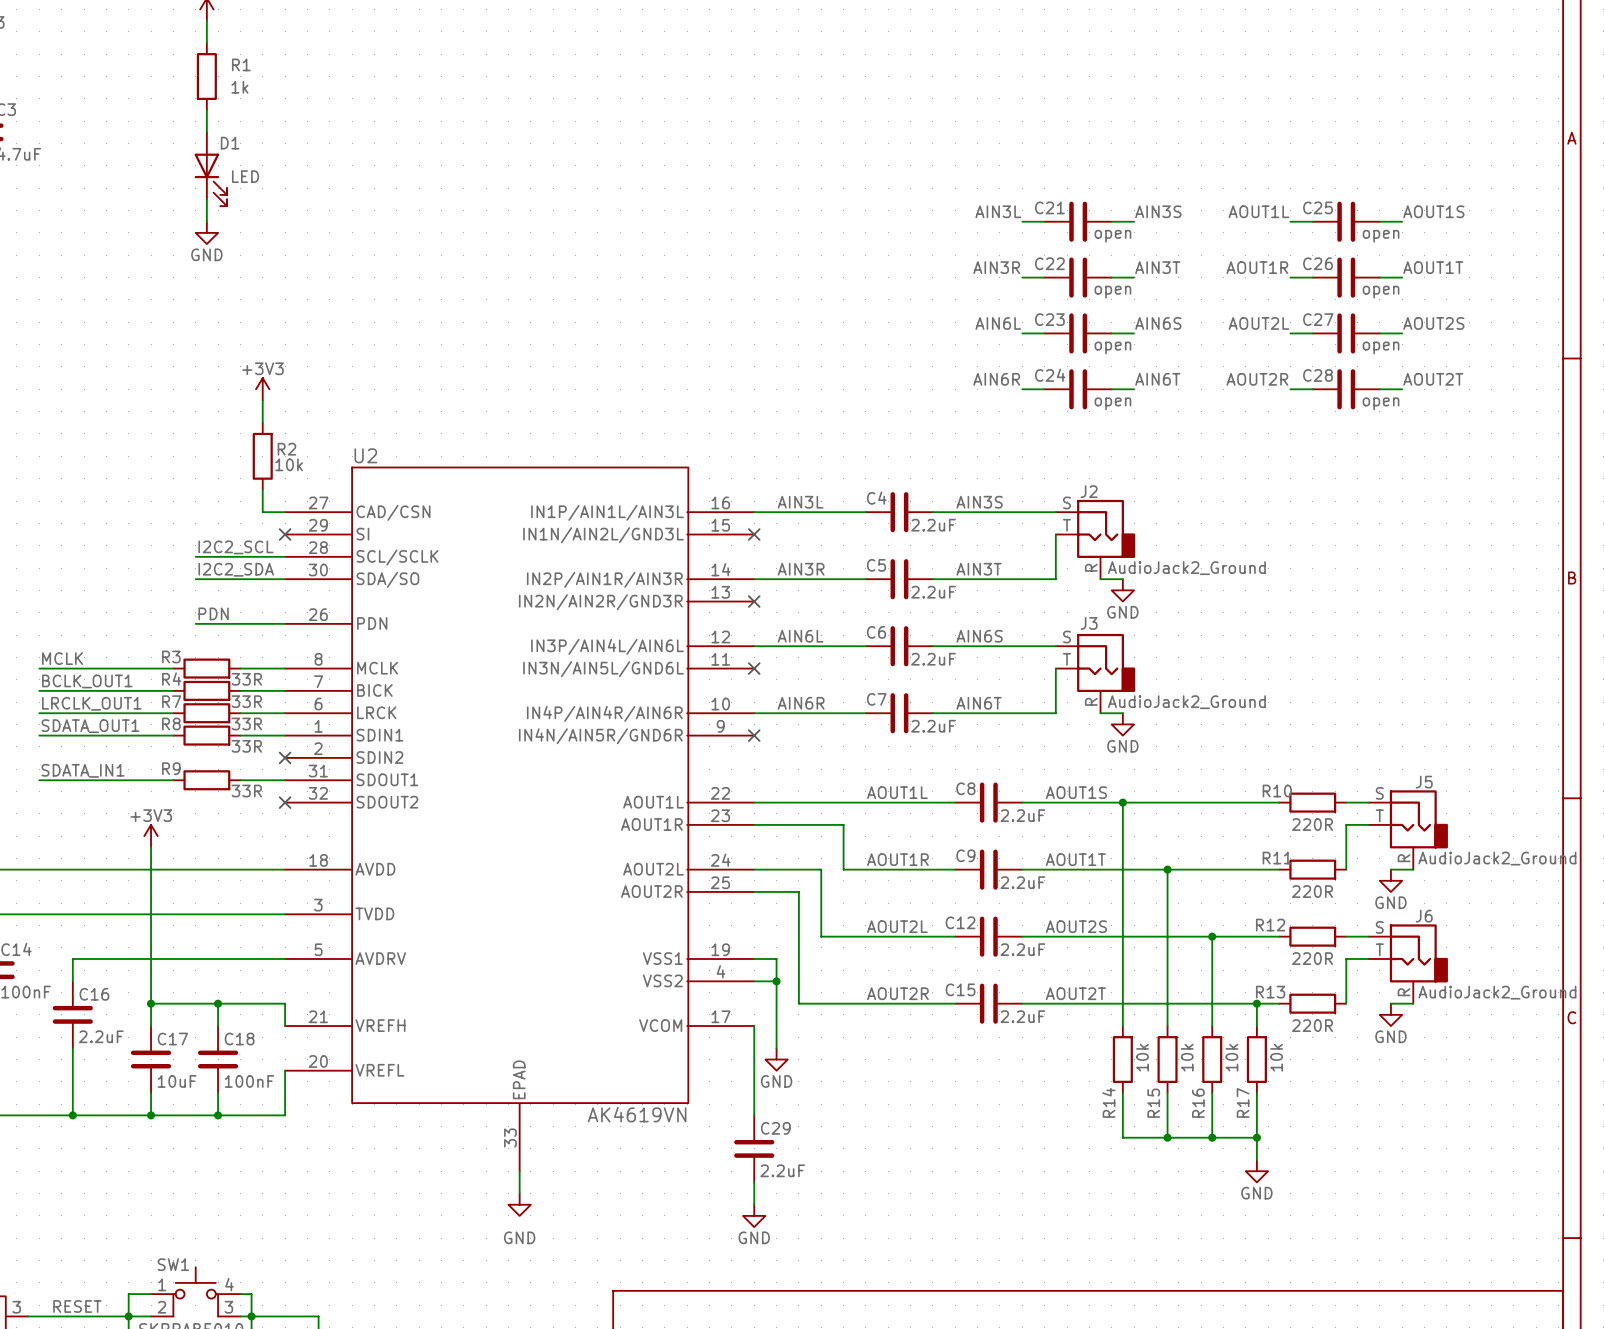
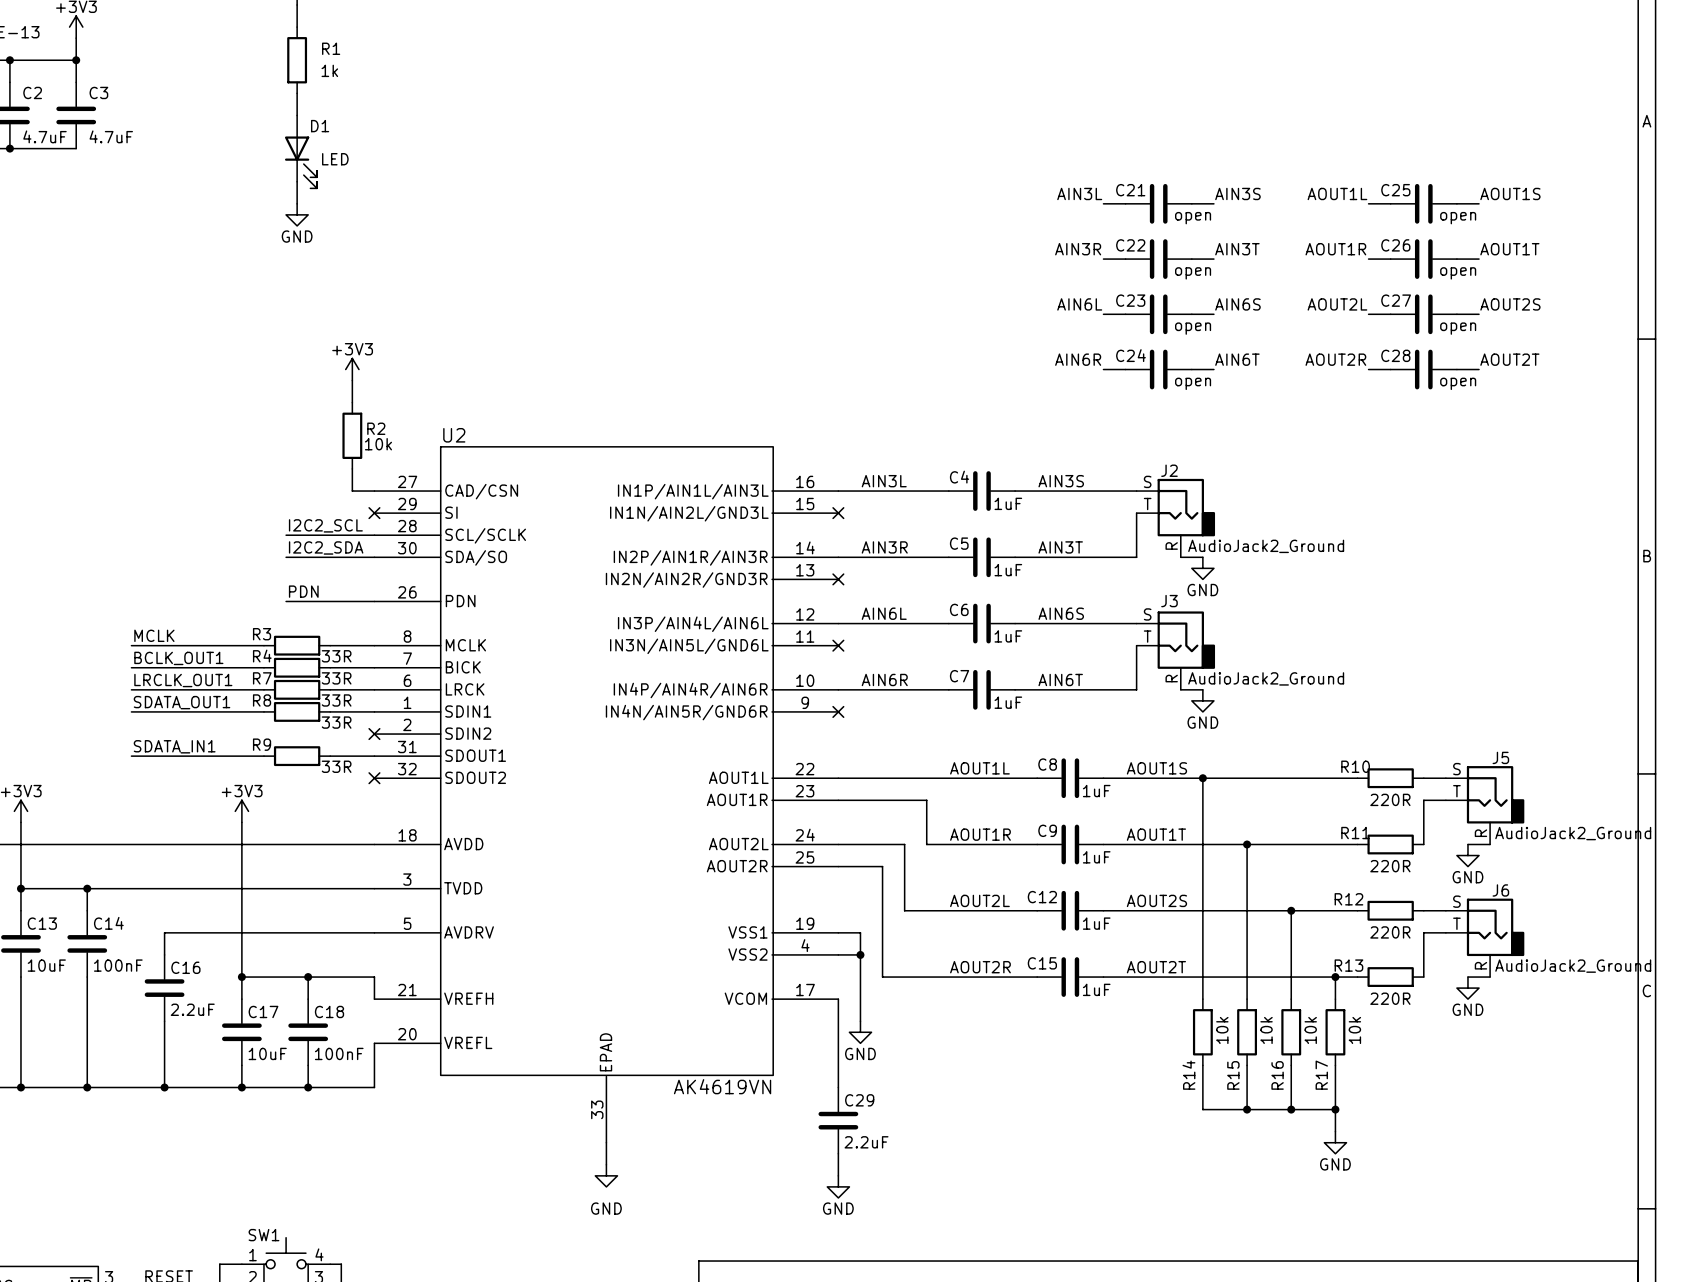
C4 value: 2.2uF (933, 525) -> 1uF (1008, 503)
C5 value: 2.2uF (933, 592) -> 1uF (1008, 570)
C6 value: 2.2uF (933, 659) -> 1uF (1008, 636)
C7 value: 2.2uF (933, 726) -> 1uF (1008, 702)
C8 value: 2.2uF (1022, 815) -> 1uF (1096, 791)
C9 value: 2.2uF (1022, 882) -> 1uF (1096, 857)
C12 value: 2.2uF (1022, 949) -> 1uF (1096, 923)
C15 value: 2.2uF (1022, 1016) -> 1uF (1096, 989)

